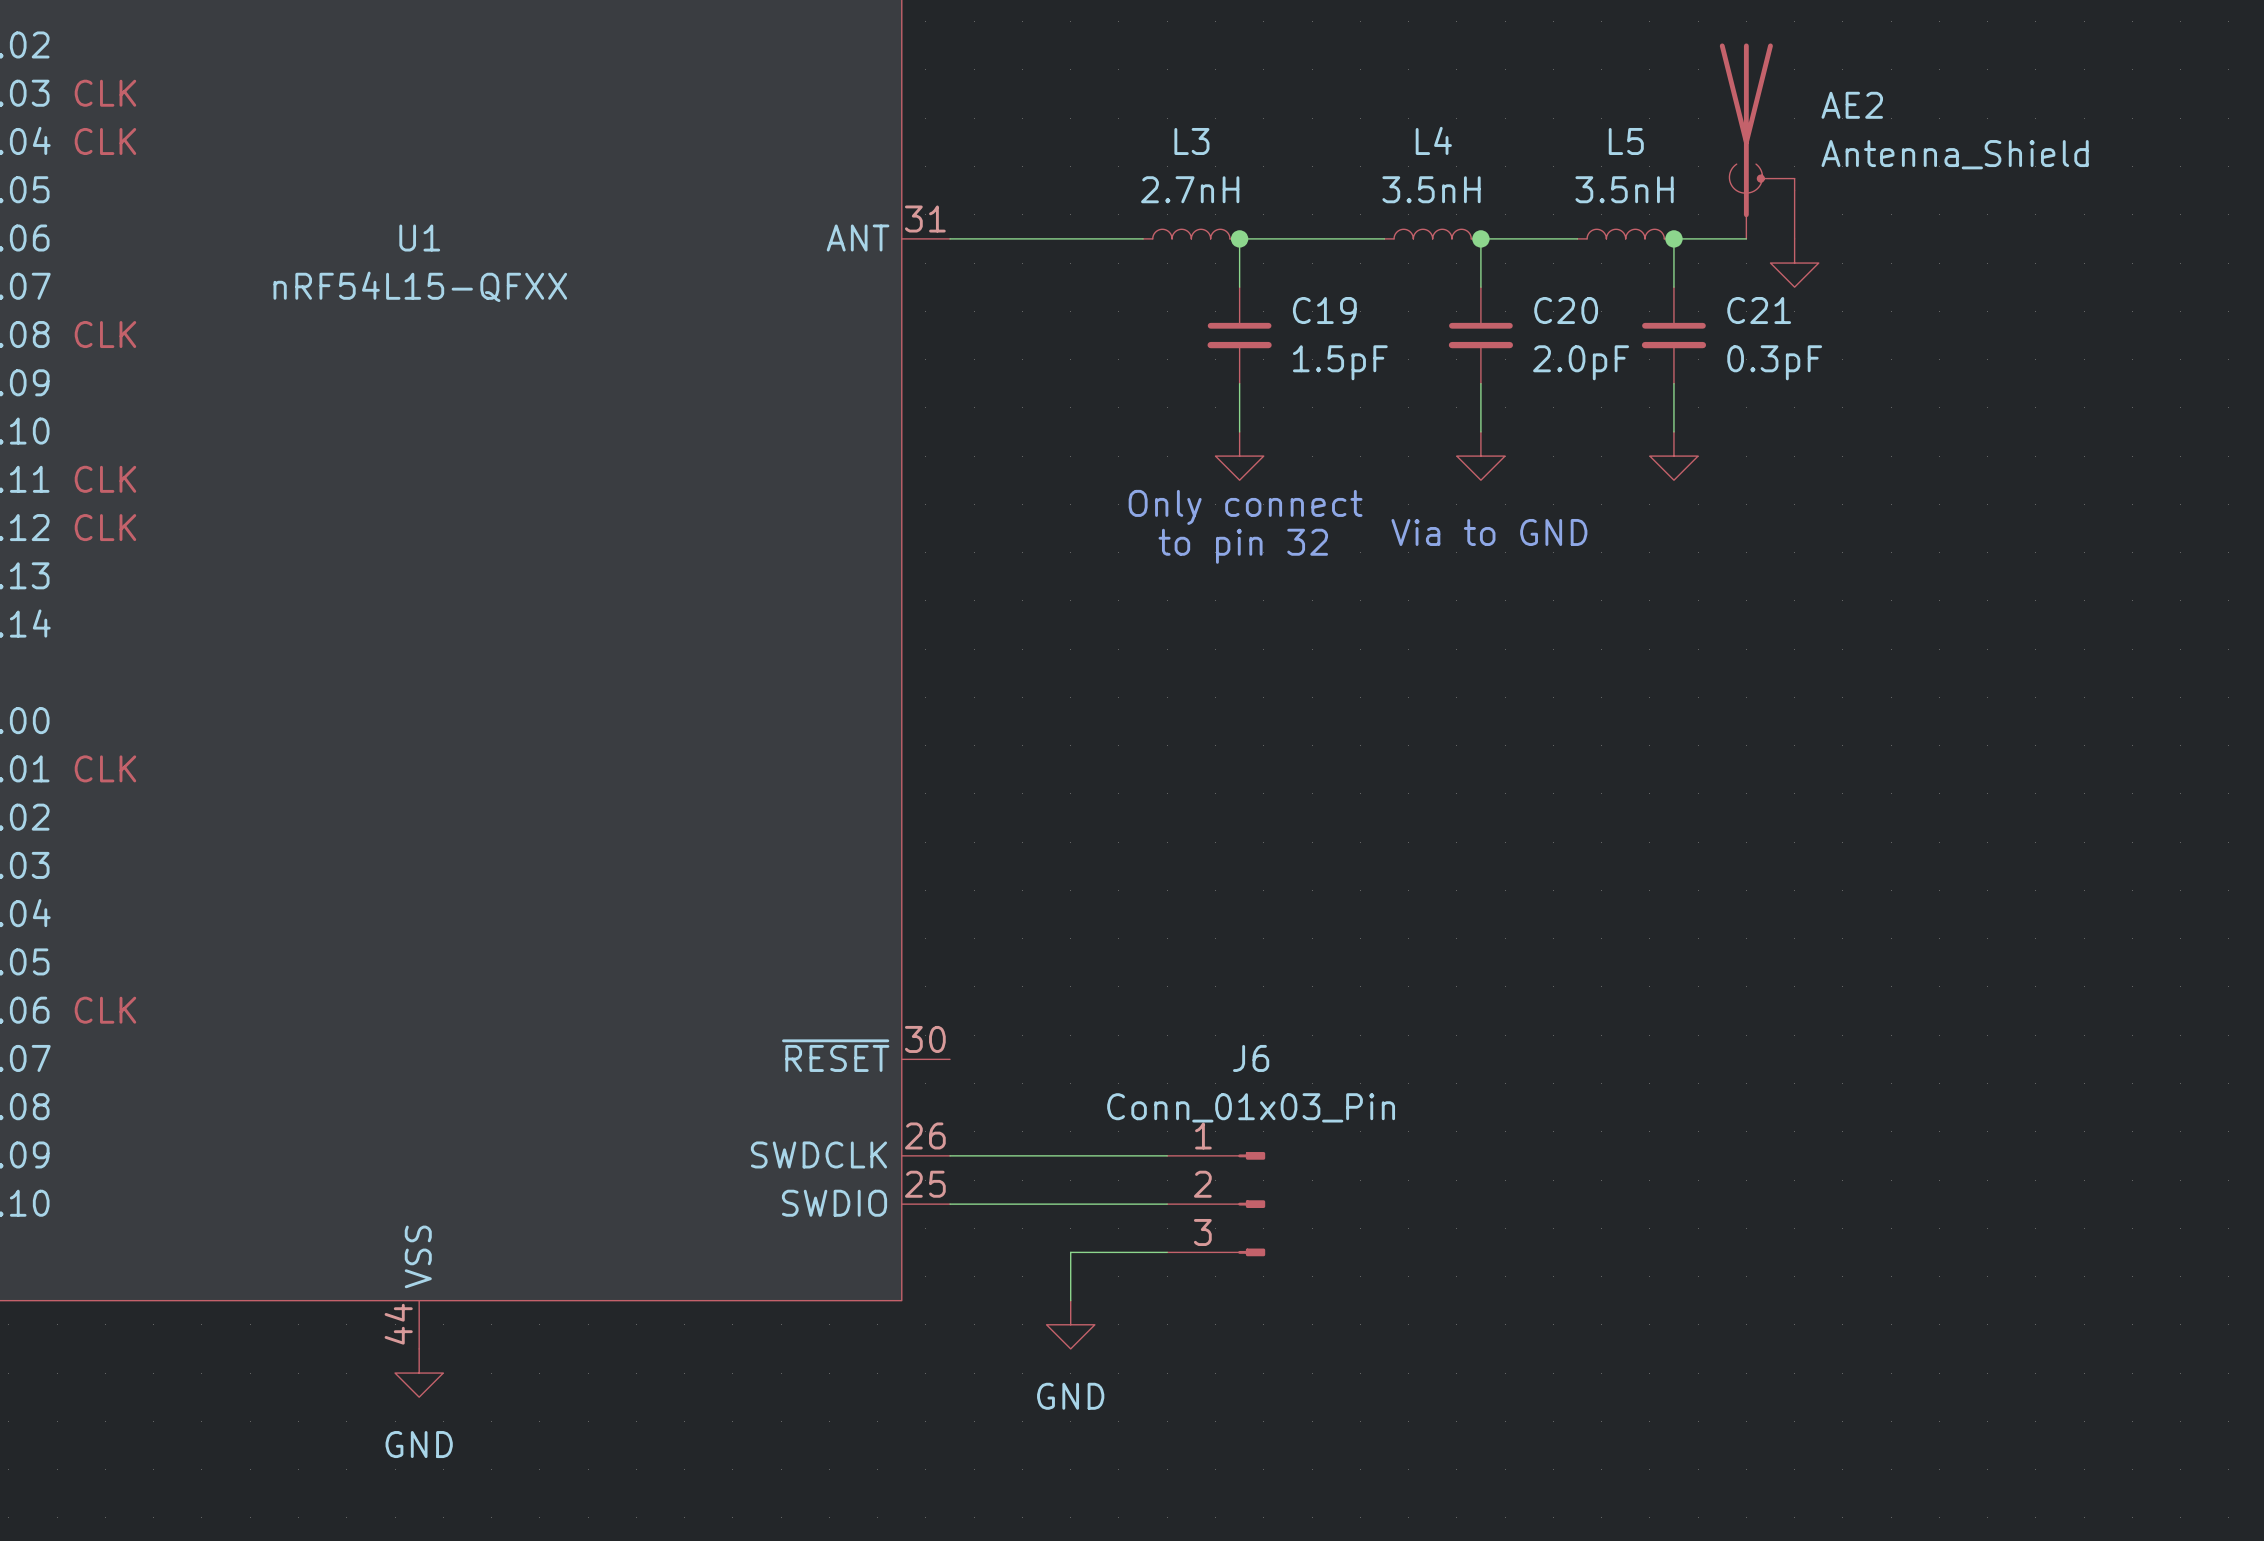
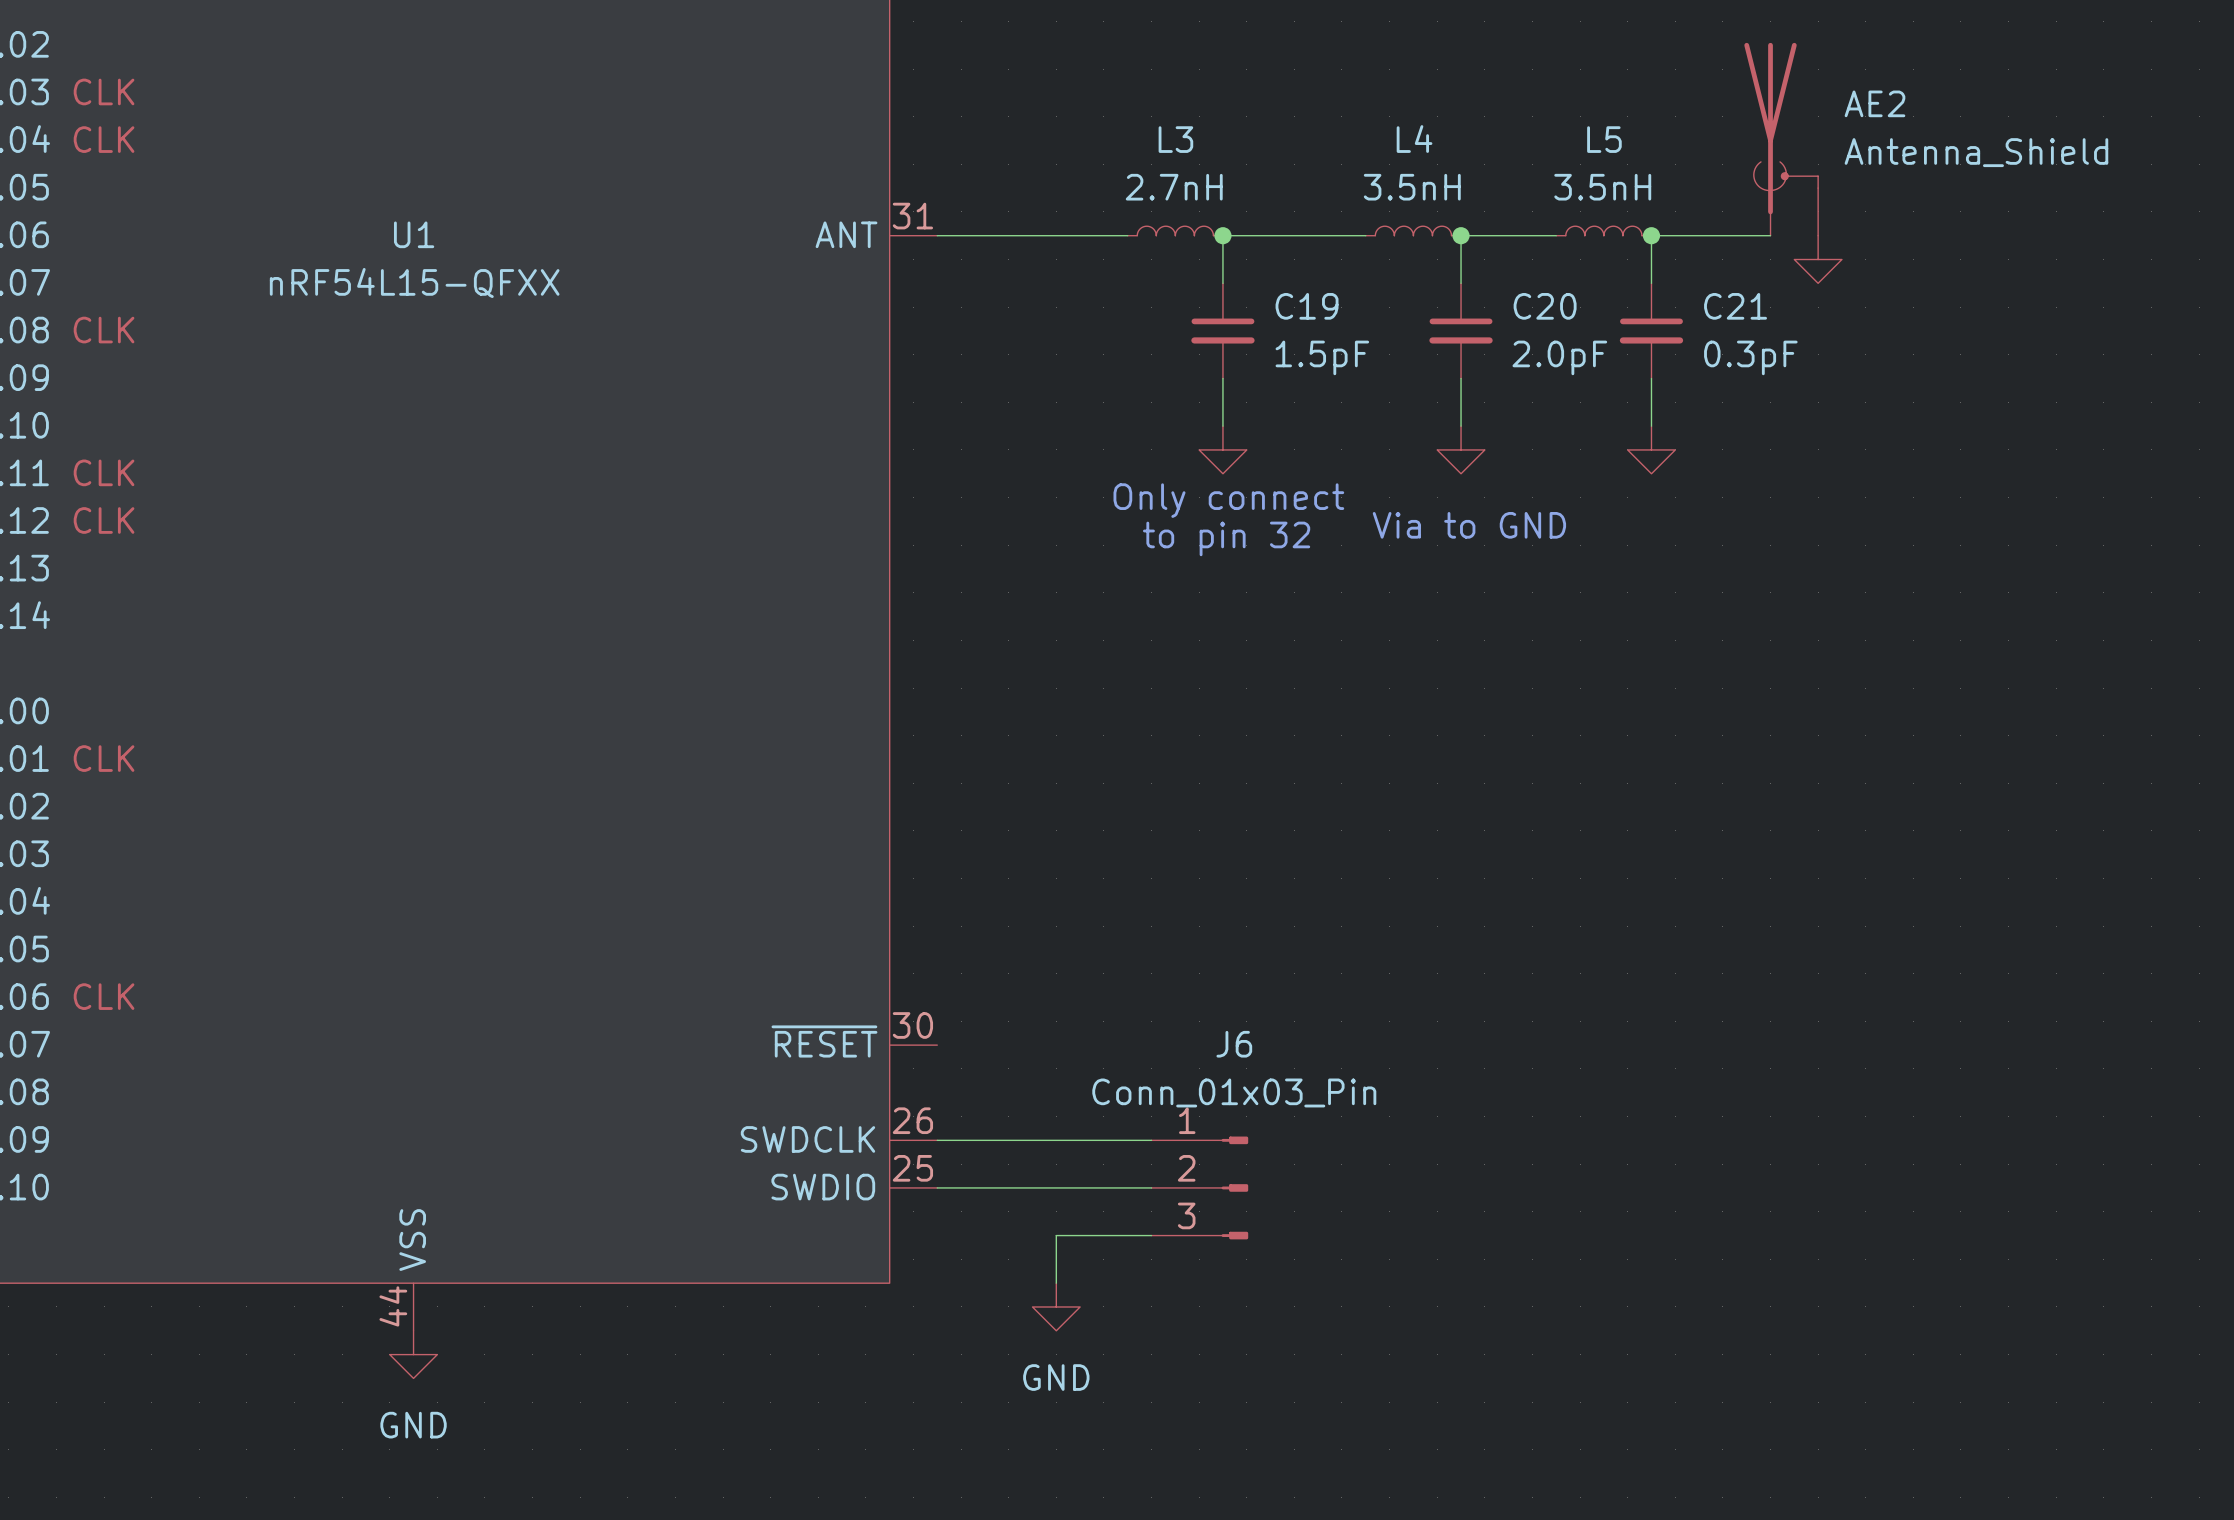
AE2 position: (1757, 141) -> (1781, 139)
wire: none -> (1722, 235) (1770, 235)
power symbol position: (1794, 263) -> (1818, 259)

